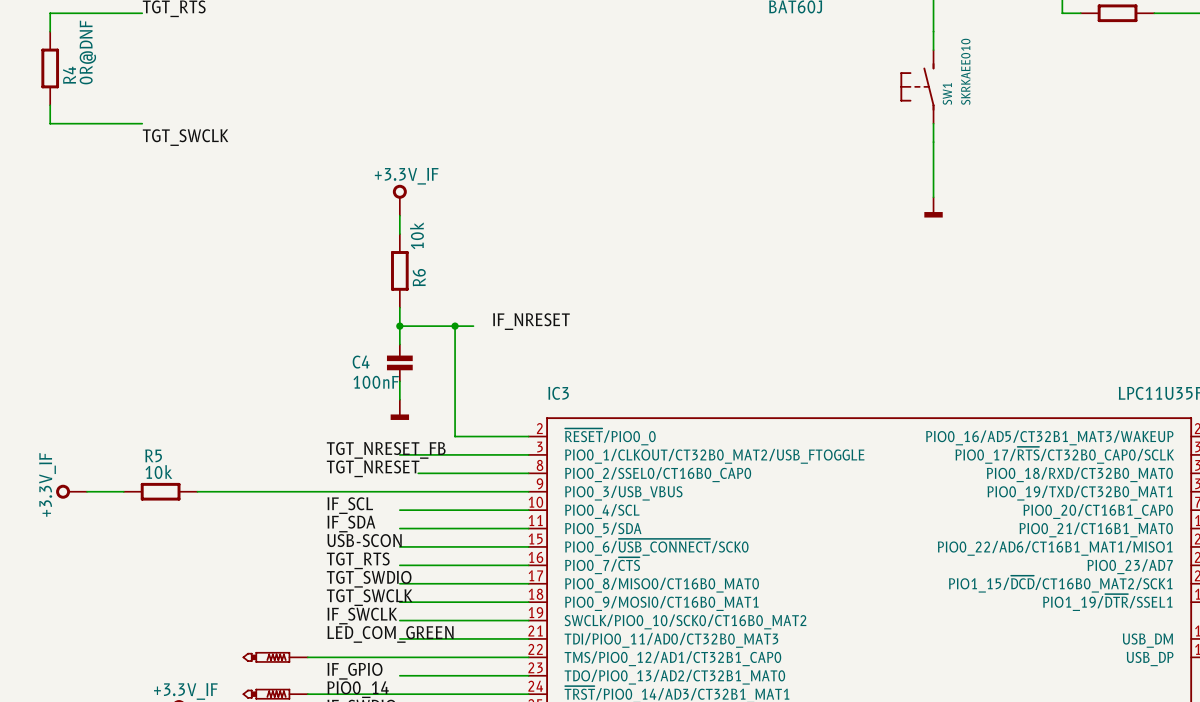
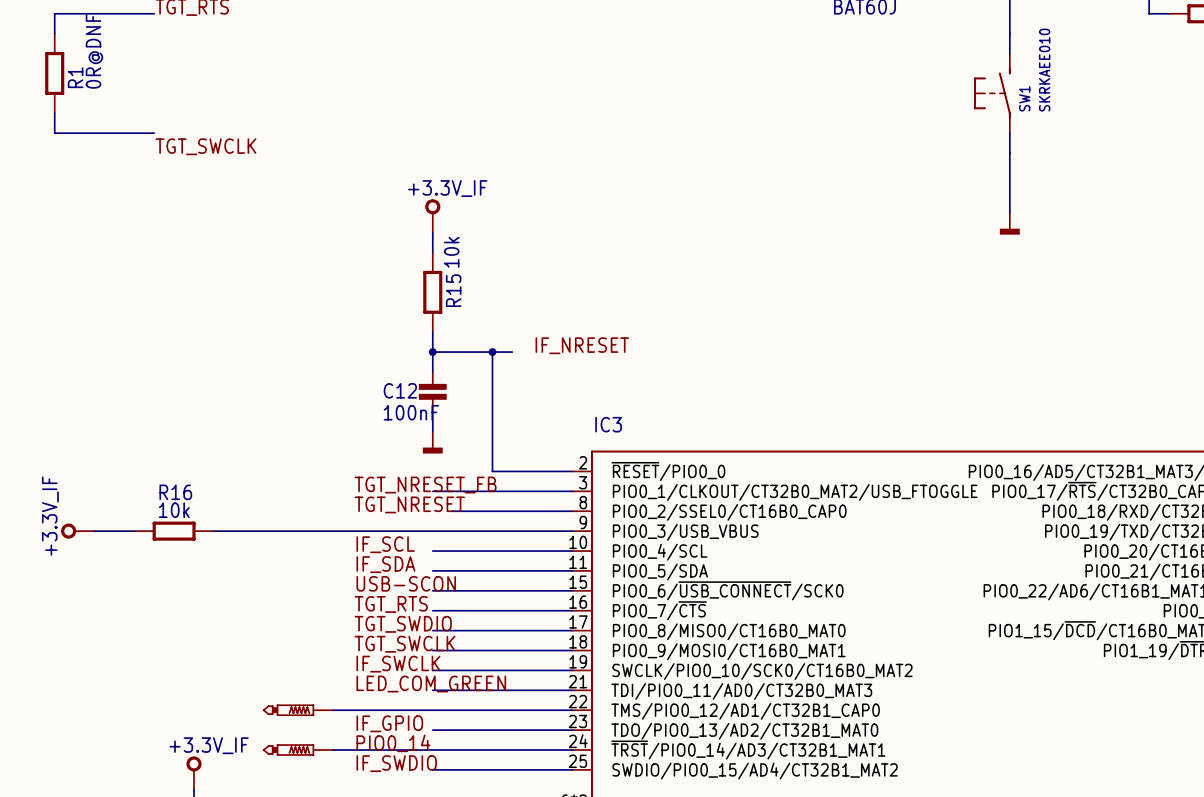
R4 name: R4 (69, 75) -> R1 (75, 77)
R6 name: R6 (419, 277) -> R15 (453, 290)
C4 name: C4 (361, 362) -> C12 (400, 390)
R5 name: R5 (153, 455) -> R16 (175, 492)

